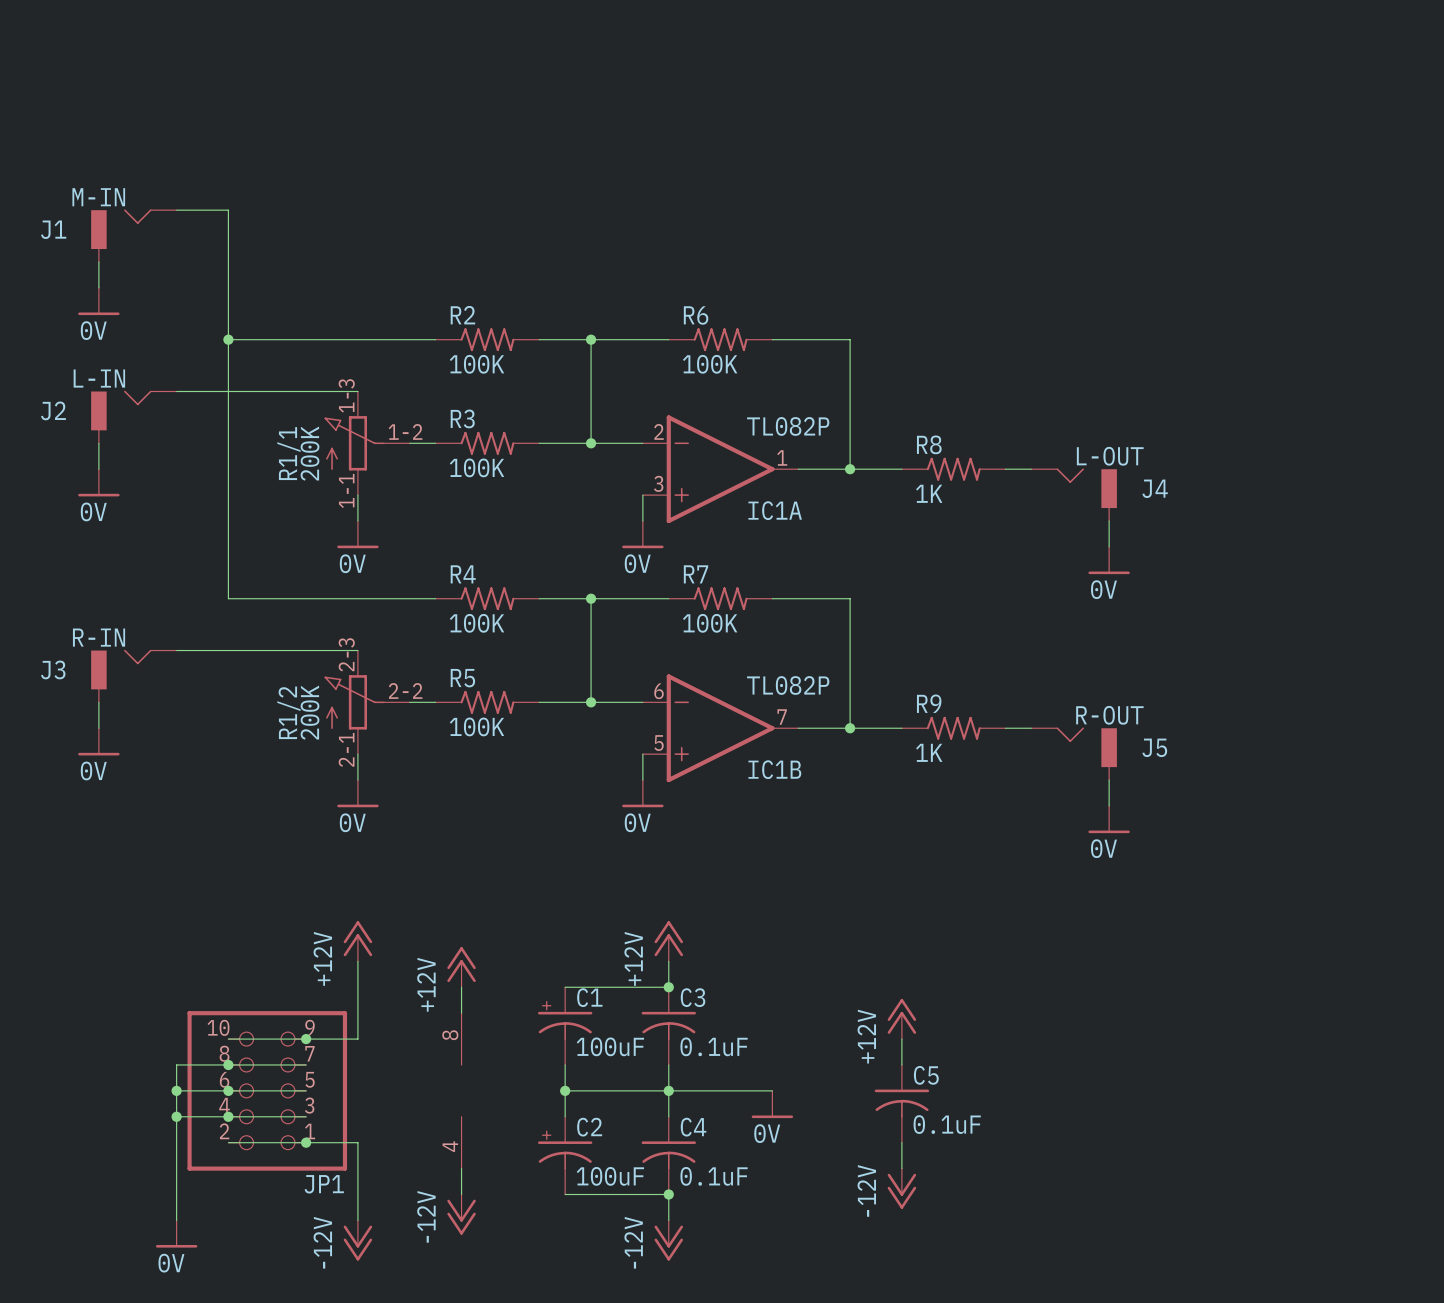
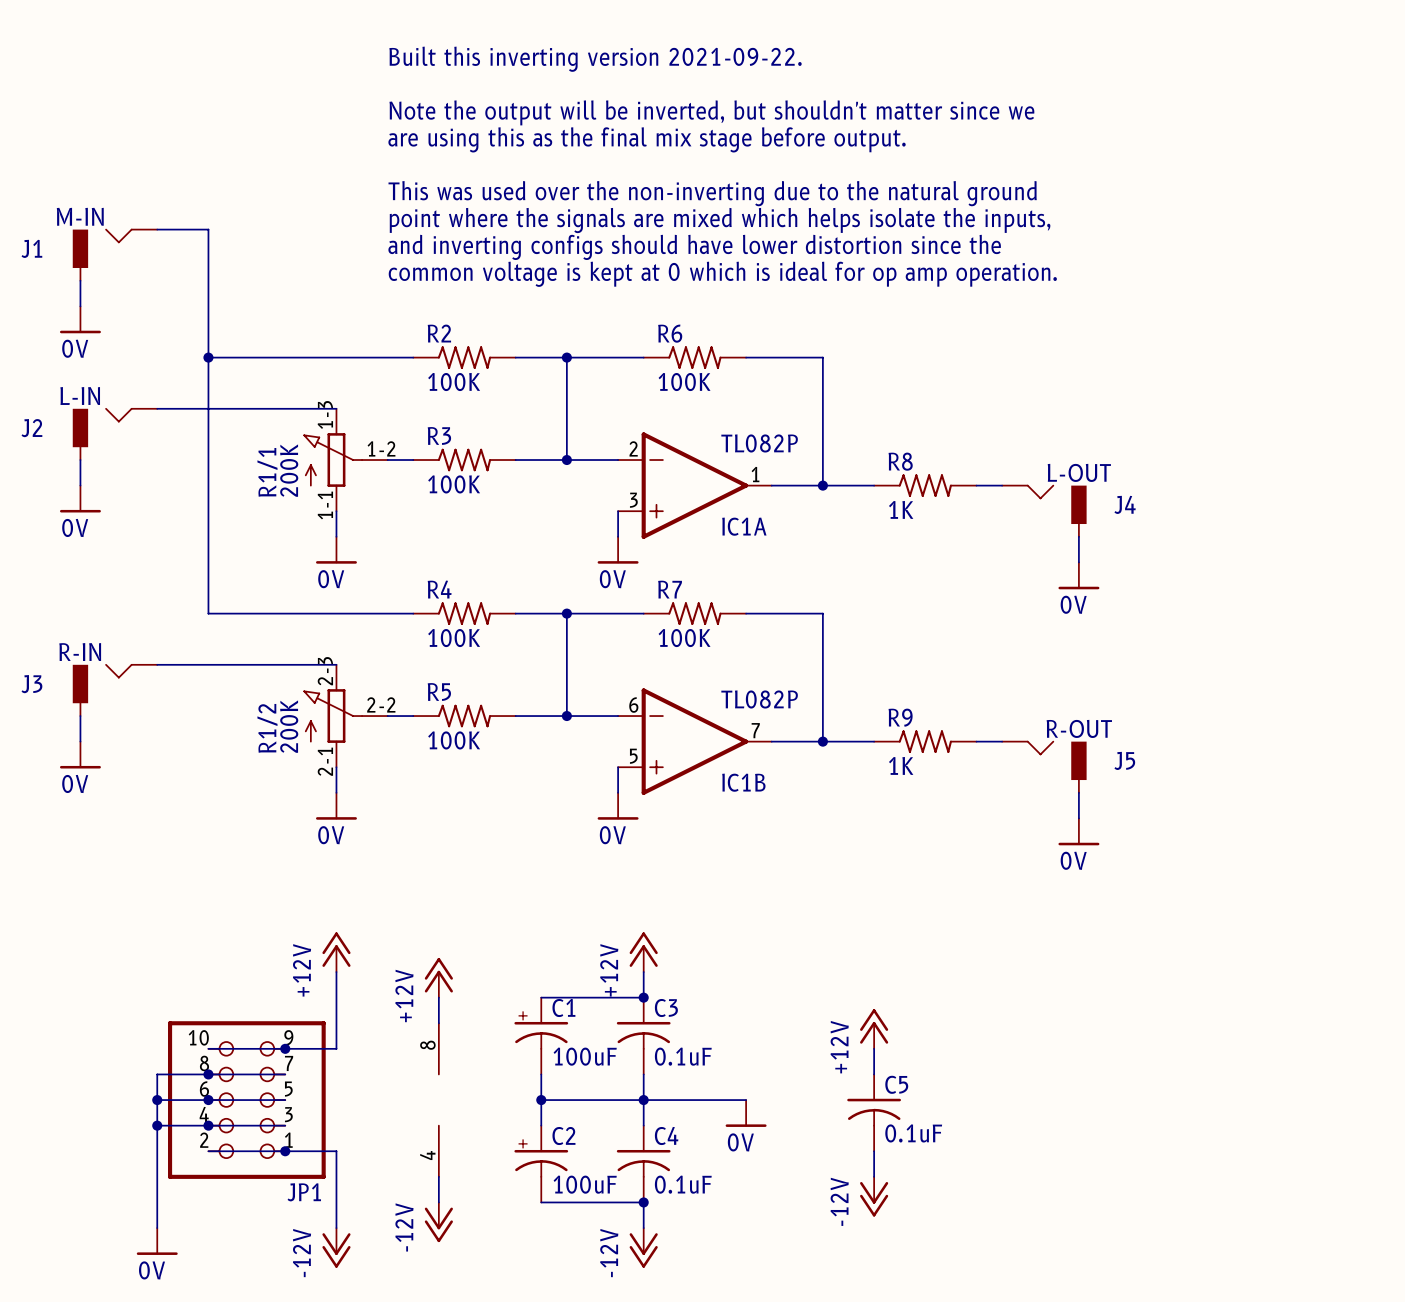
text: none -> Built this inverting version 2021-09-22. (595, 59)
text: none -> Note the output will be inverted, but shouldn't matter since we (711, 112)
text: none -> are using this as the final mix stage before output. (647, 139)
text: none -> This was used over the non-inverting due to the natural ground (712, 193)
text: none -> point where the signals are mixed which helps isolate the inputs, (720, 220)
text: none -> and inverting configs should have lower distortion since the (694, 247)
text: none -> common voltage is kept at 0 which is ideal for op amp operation. (722, 274)

